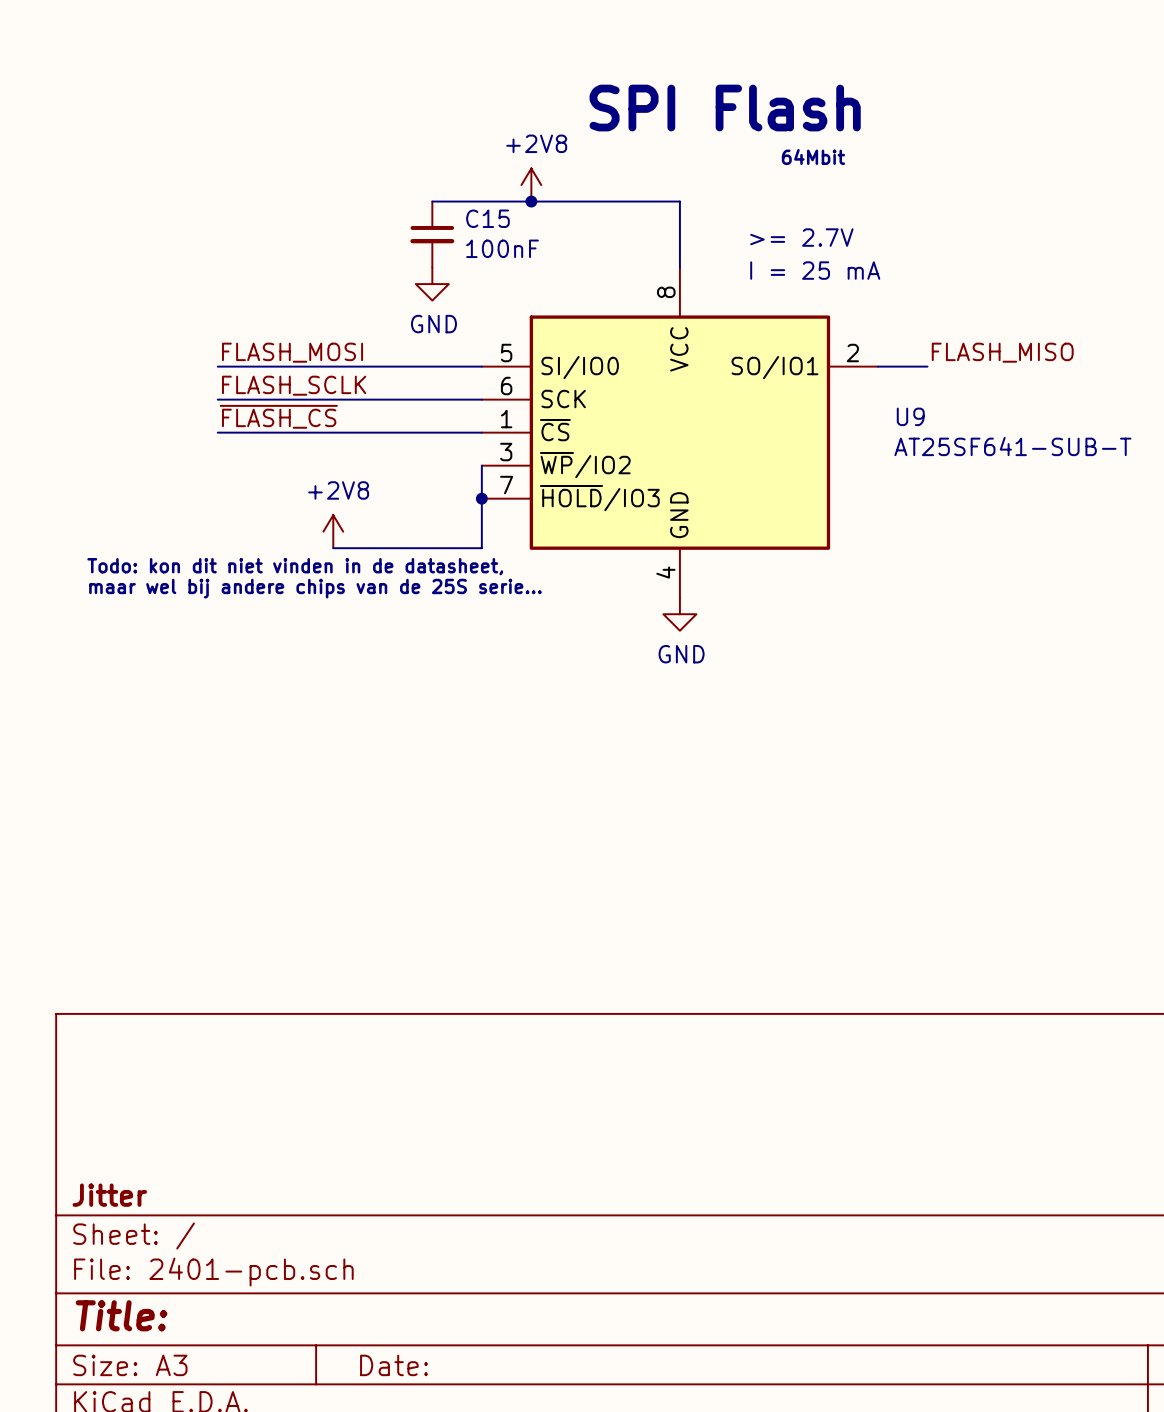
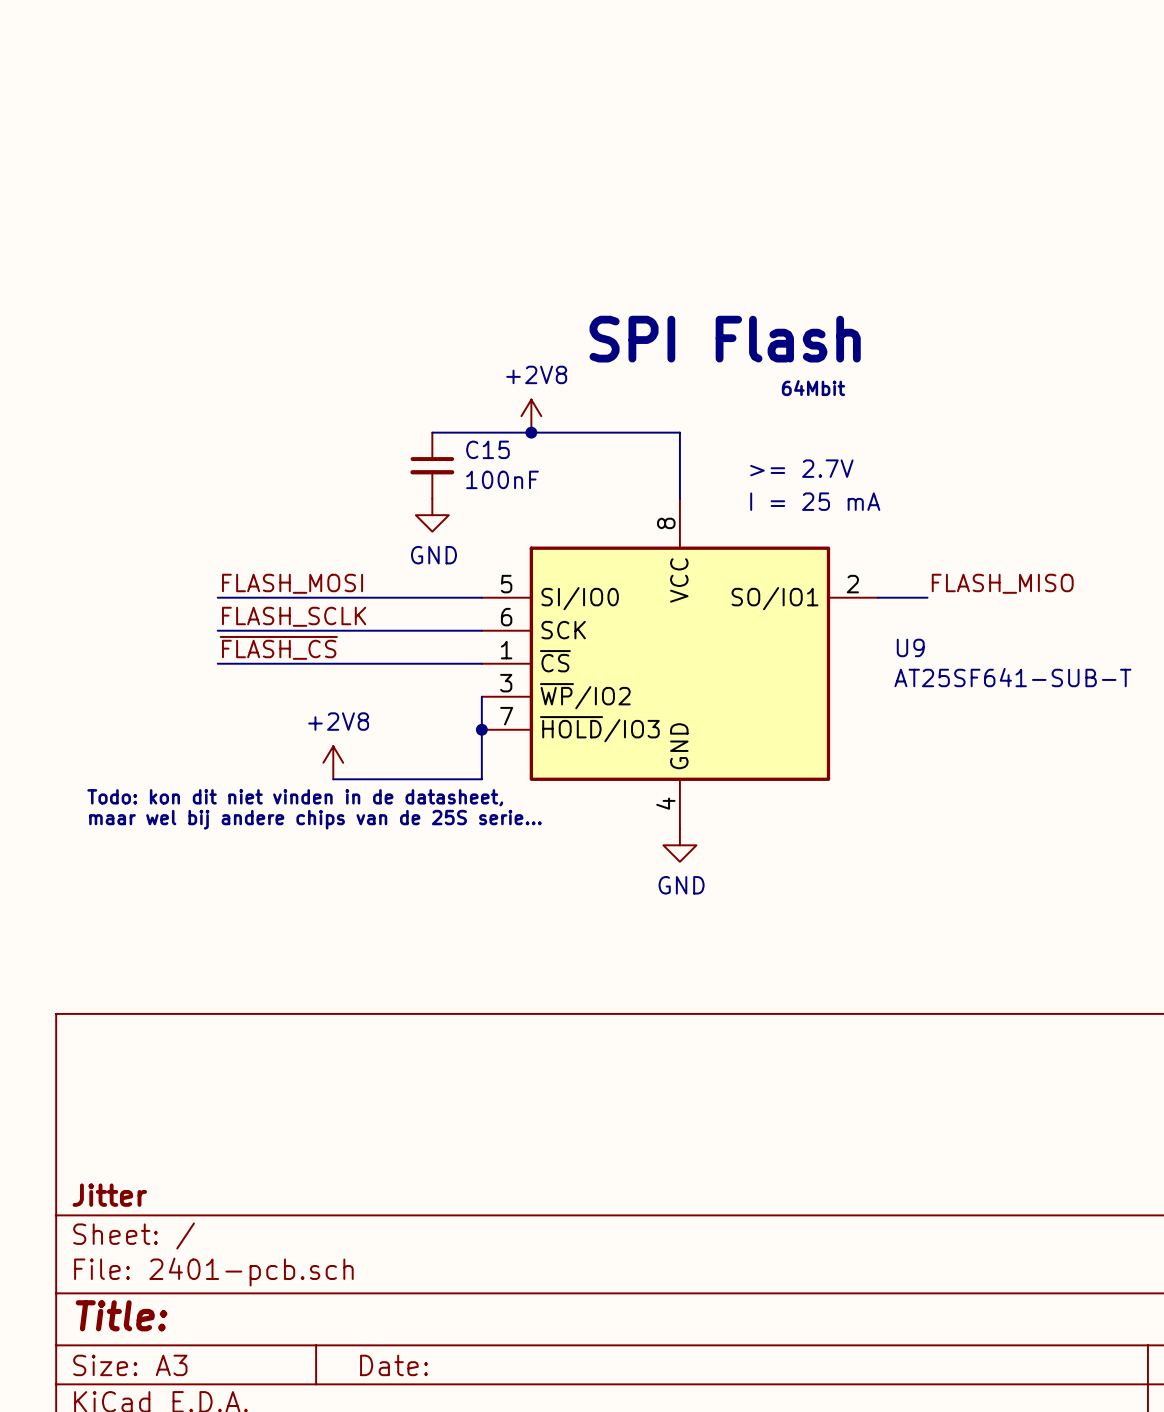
text position: SPI Flash (725, 108) -> SPI Flash (725, 339)
text position: 64Mbit (813, 156) -> 64Mbit (813, 388)
power symbol: +2V8 (531, 185) -> none
wire: (432, 201) (679, 201) (679, 267) -> none
junction: (531, 201) -> none
C15 position: (432, 234) -> (432, 465)
text position: >= 2.7V (801, 237) -> >= 2.7V (801, 468)
text position: I = 25 mA (815, 270) -> I = 25 mA (815, 501)
power symbol: GND (432, 284) -> none
label position: FLASH_MOSI (292, 352) -> FLASH_MOSI (292, 583)
label position: FLASH_MISO (1002, 352) -> FLASH_MISO (1002, 583)
wire: (217, 366) (481, 366) -> (217, 597) (481, 597)
wire: (878, 366) (927, 366) -> (878, 597) (927, 597)
label position: FLASH_SCLK (294, 385) -> FLASH_SCLK (294, 616)
wire: (217, 399) (481, 399) -> (217, 630) (481, 630)
label position: ~{FLASH_CS} (278, 416) -> ~{FLASH_CS} (278, 647)
power symbol: none -> +2V8 (531, 416)
wire: (217, 432) (432, 432) -> none
junction: none -> (531, 432)
U9 position: (679, 432) -> (679, 663)
wire: (481, 465) (481, 548) (333, 548) -> (481, 696) (481, 779) (333, 779)
junction: (481, 498) -> none
power symbol: none -> GND (432, 515)
power symbol: +2V8 (333, 531) -> none
text position: Todo: kon dit niet vinden in de datasheet, (295, 566) -> Todo: kon dit niet vinden in de datasheet, (295, 797)
text position: maar wel bij andere chips van de 25S serie… (315, 588) -> maar wel bij andere chips van de 25S serie… (315, 819)
power symbol: GND (679, 614) -> none
wire: none -> (217, 663) (481, 663)
junction: none -> (481, 729)
power symbol: none -> +2V8 (333, 762)
power symbol: none -> GND (679, 845)

